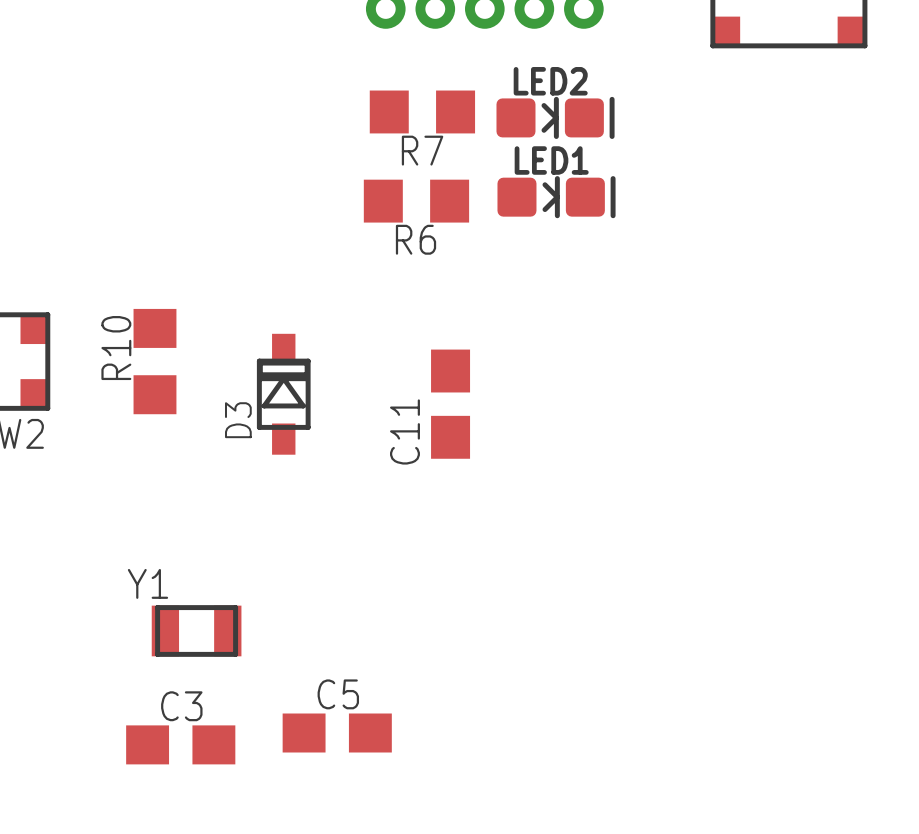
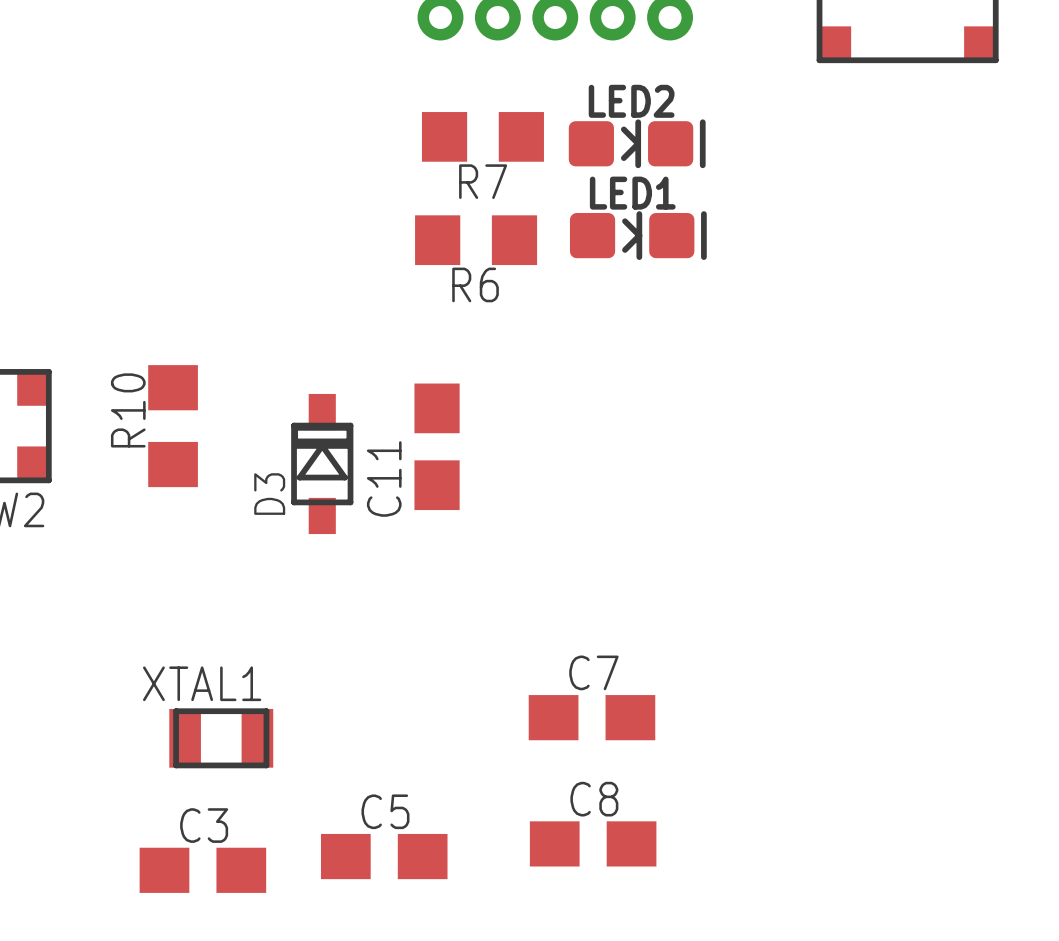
C11 position: (450, 404) -> (437, 446)
Y1 name: Y1 (147, 583) -> XTAL1 (202, 683)
C7: none -> (591, 717)
C8: none -> (593, 843)

